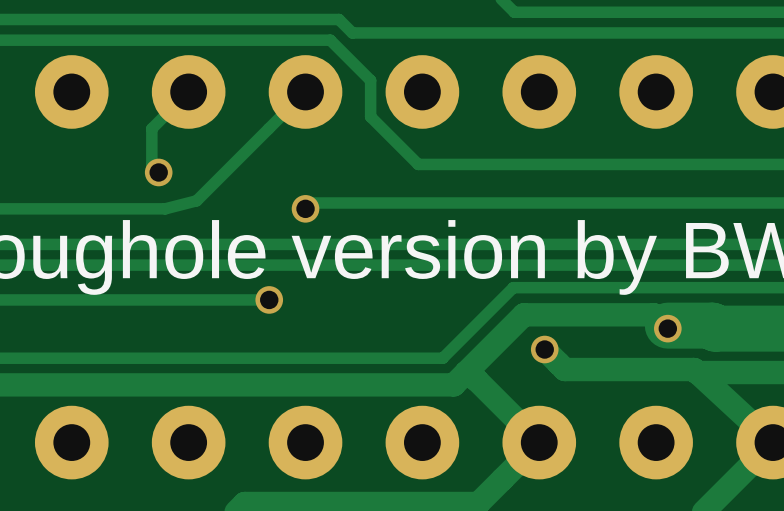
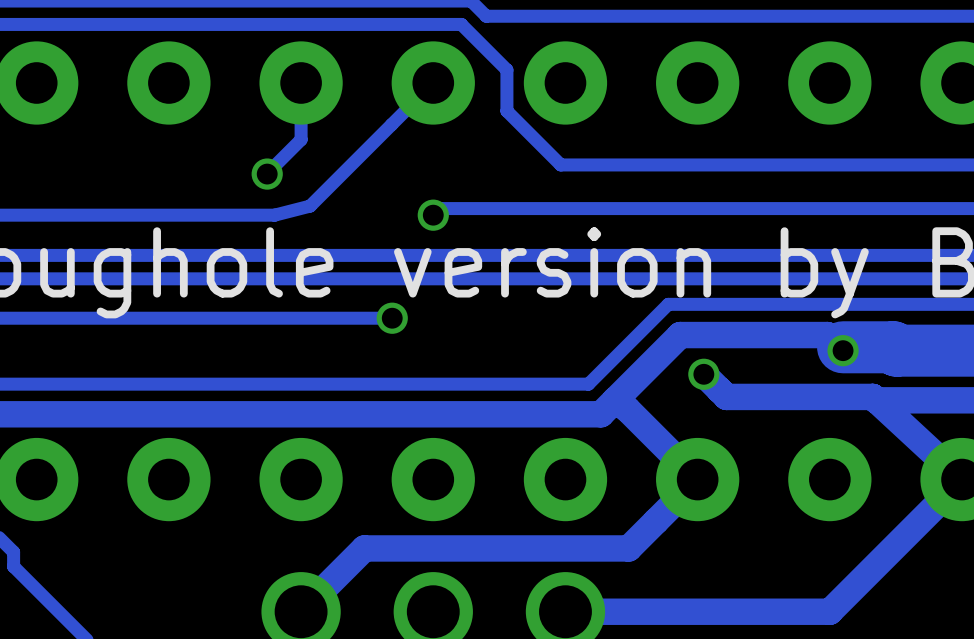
track: (188, 91) (151, 128) (151, 165) (158, 172) -> (301, 82) (301, 139) (267, 173)

